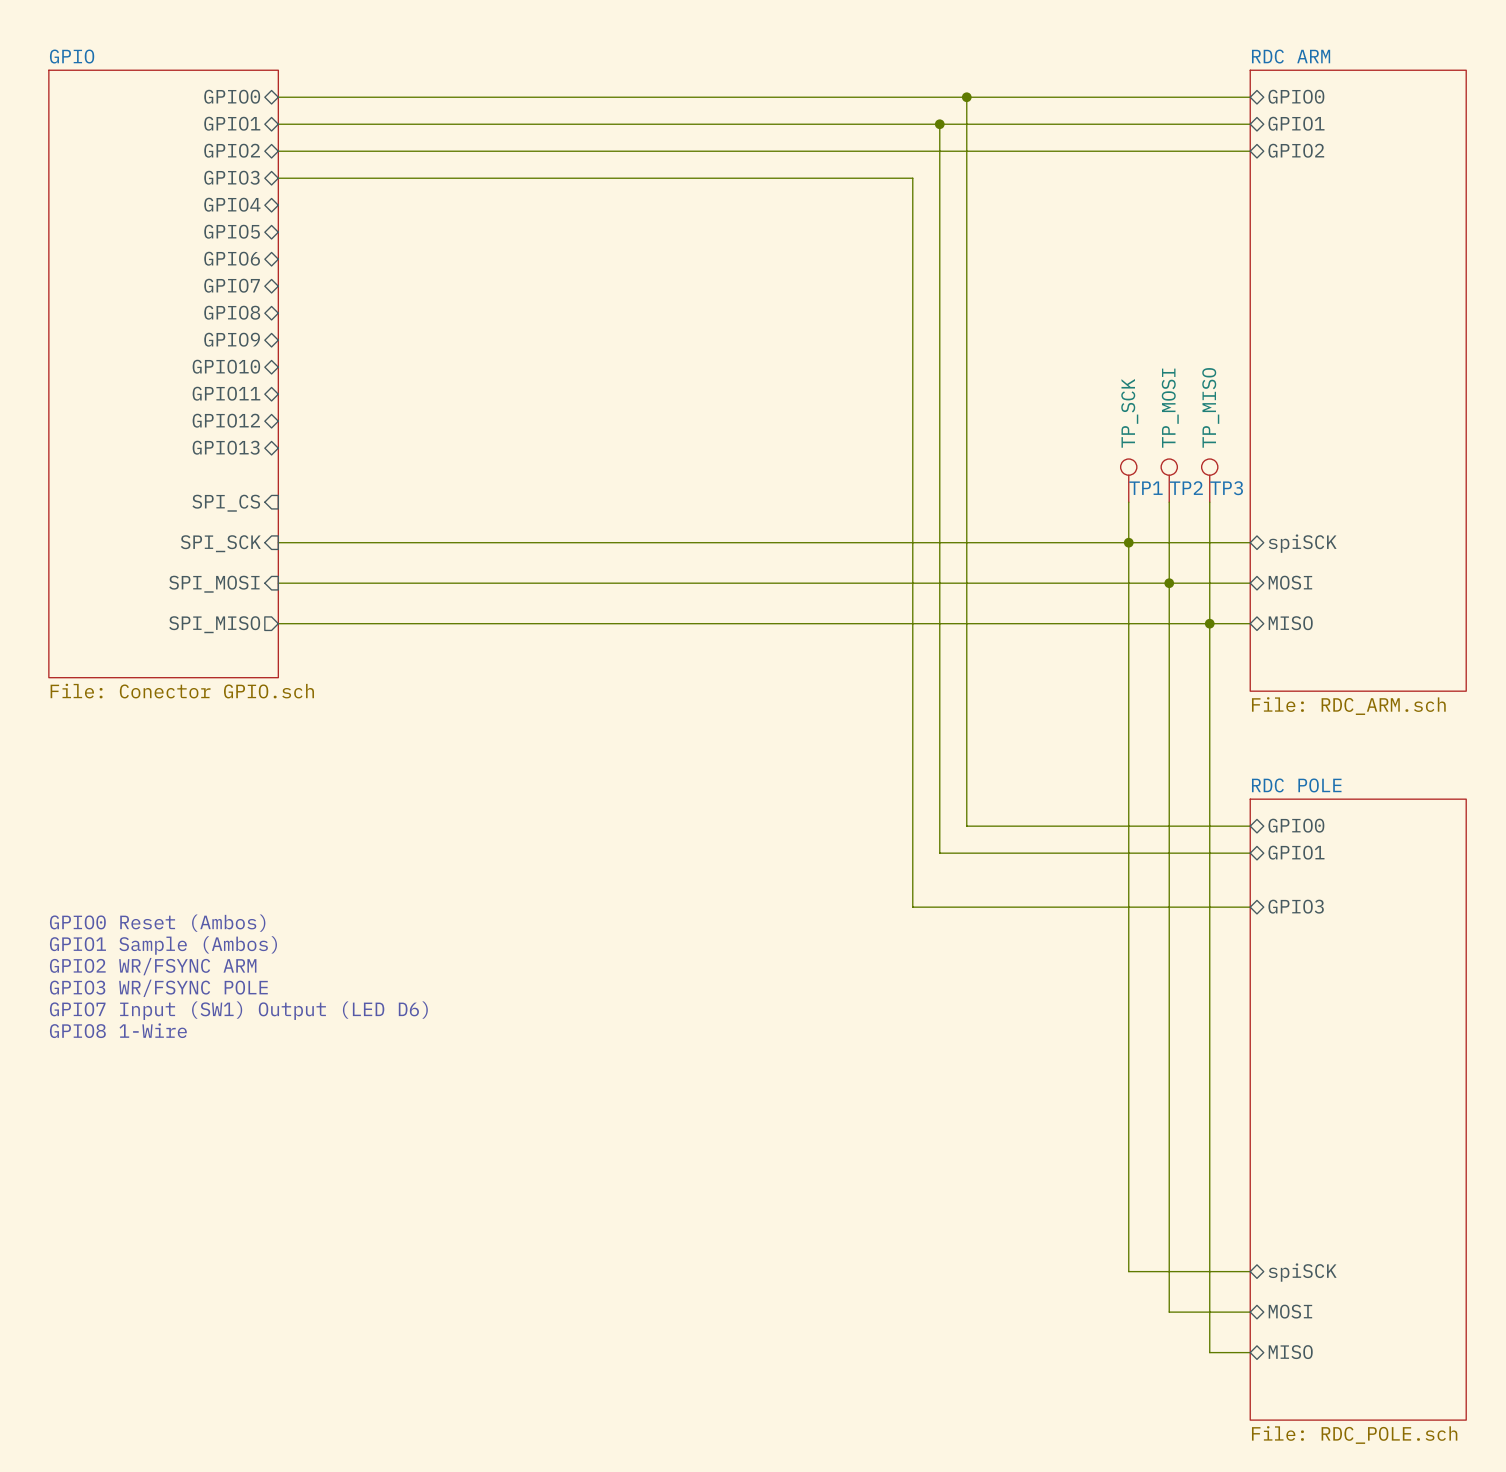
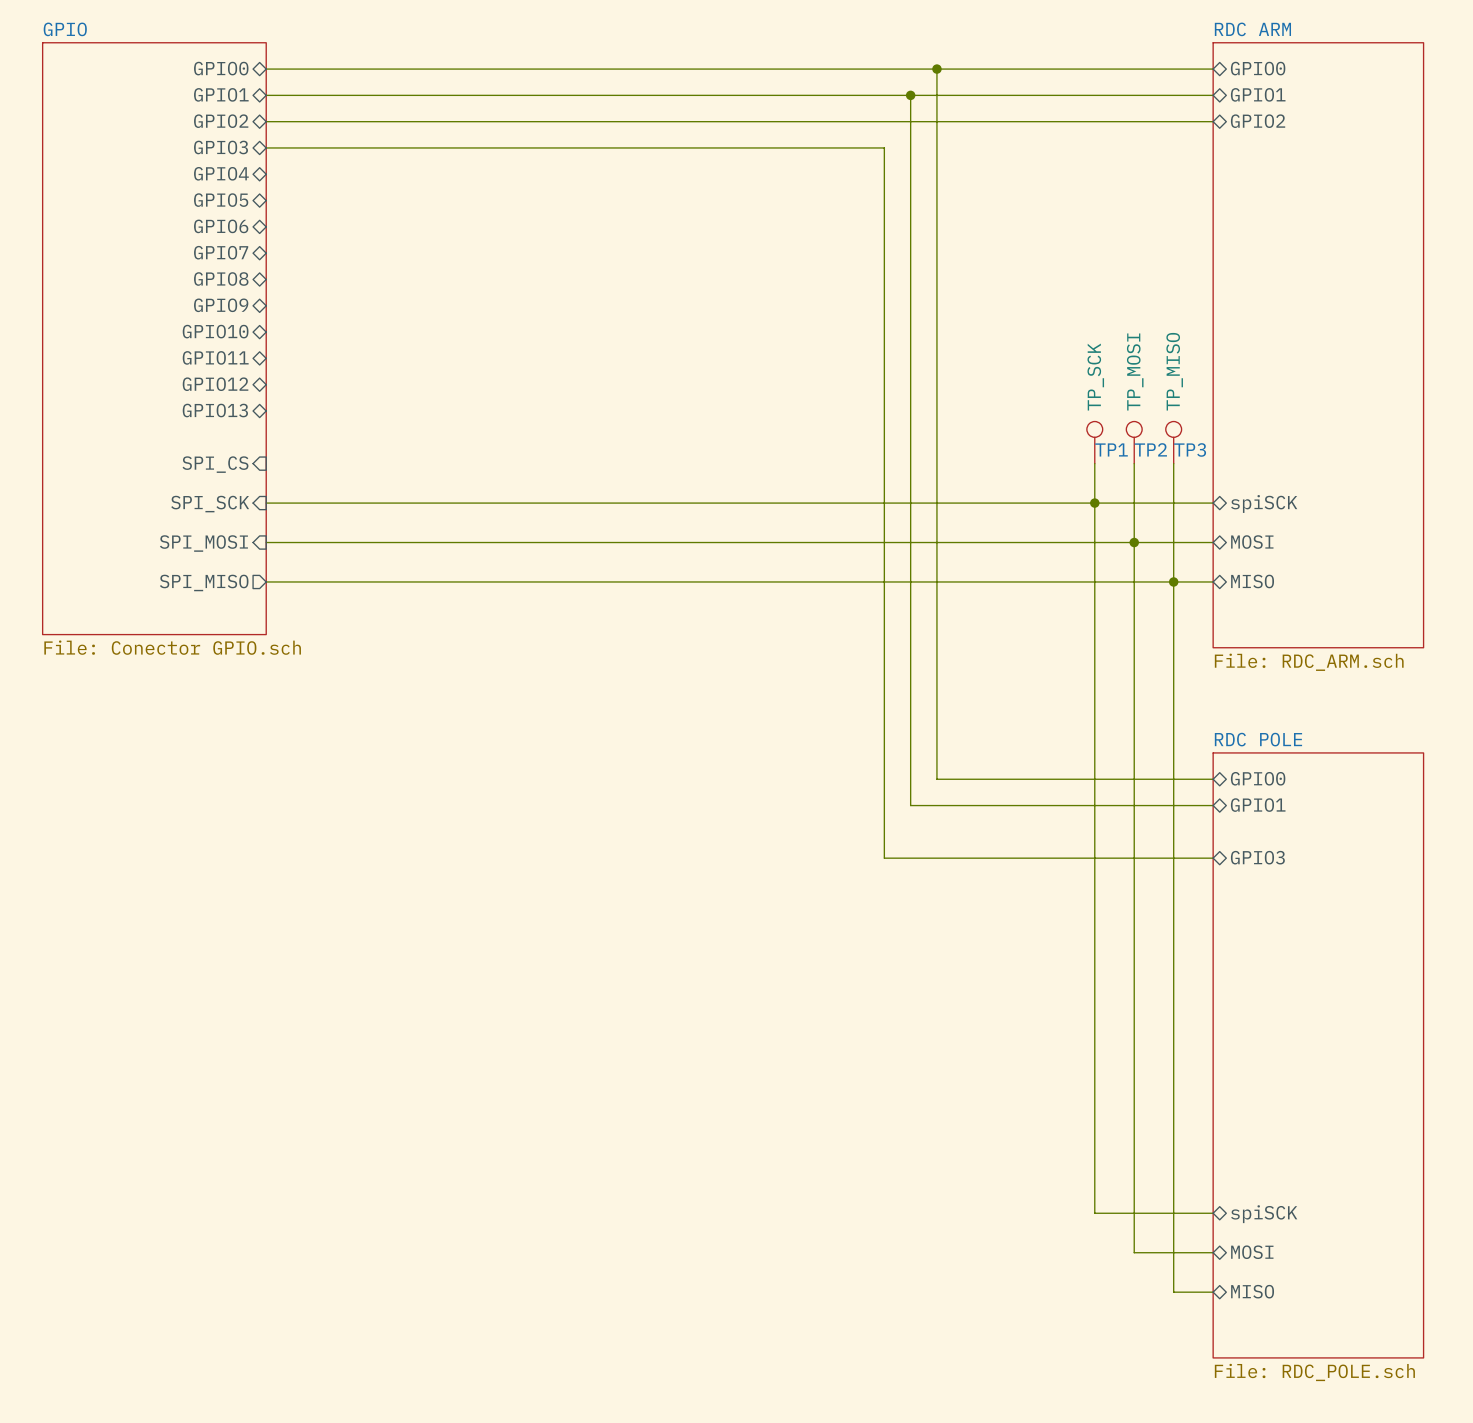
text: GPIO0 Reset (Ambos) (157, 923) -> none
text: GPIO1 Sample (Ambos) (163, 945) -> none
text: GPIO2 WR/FSYNC ARM (153, 966) -> none
text: GPIO3 WR/FSYNC POLE (158, 988) -> none
text: GPIO7 Input (SW1) Output (LED D6) (238, 1010) -> none
text: GPIO8 1-Wire (118, 1030) -> none

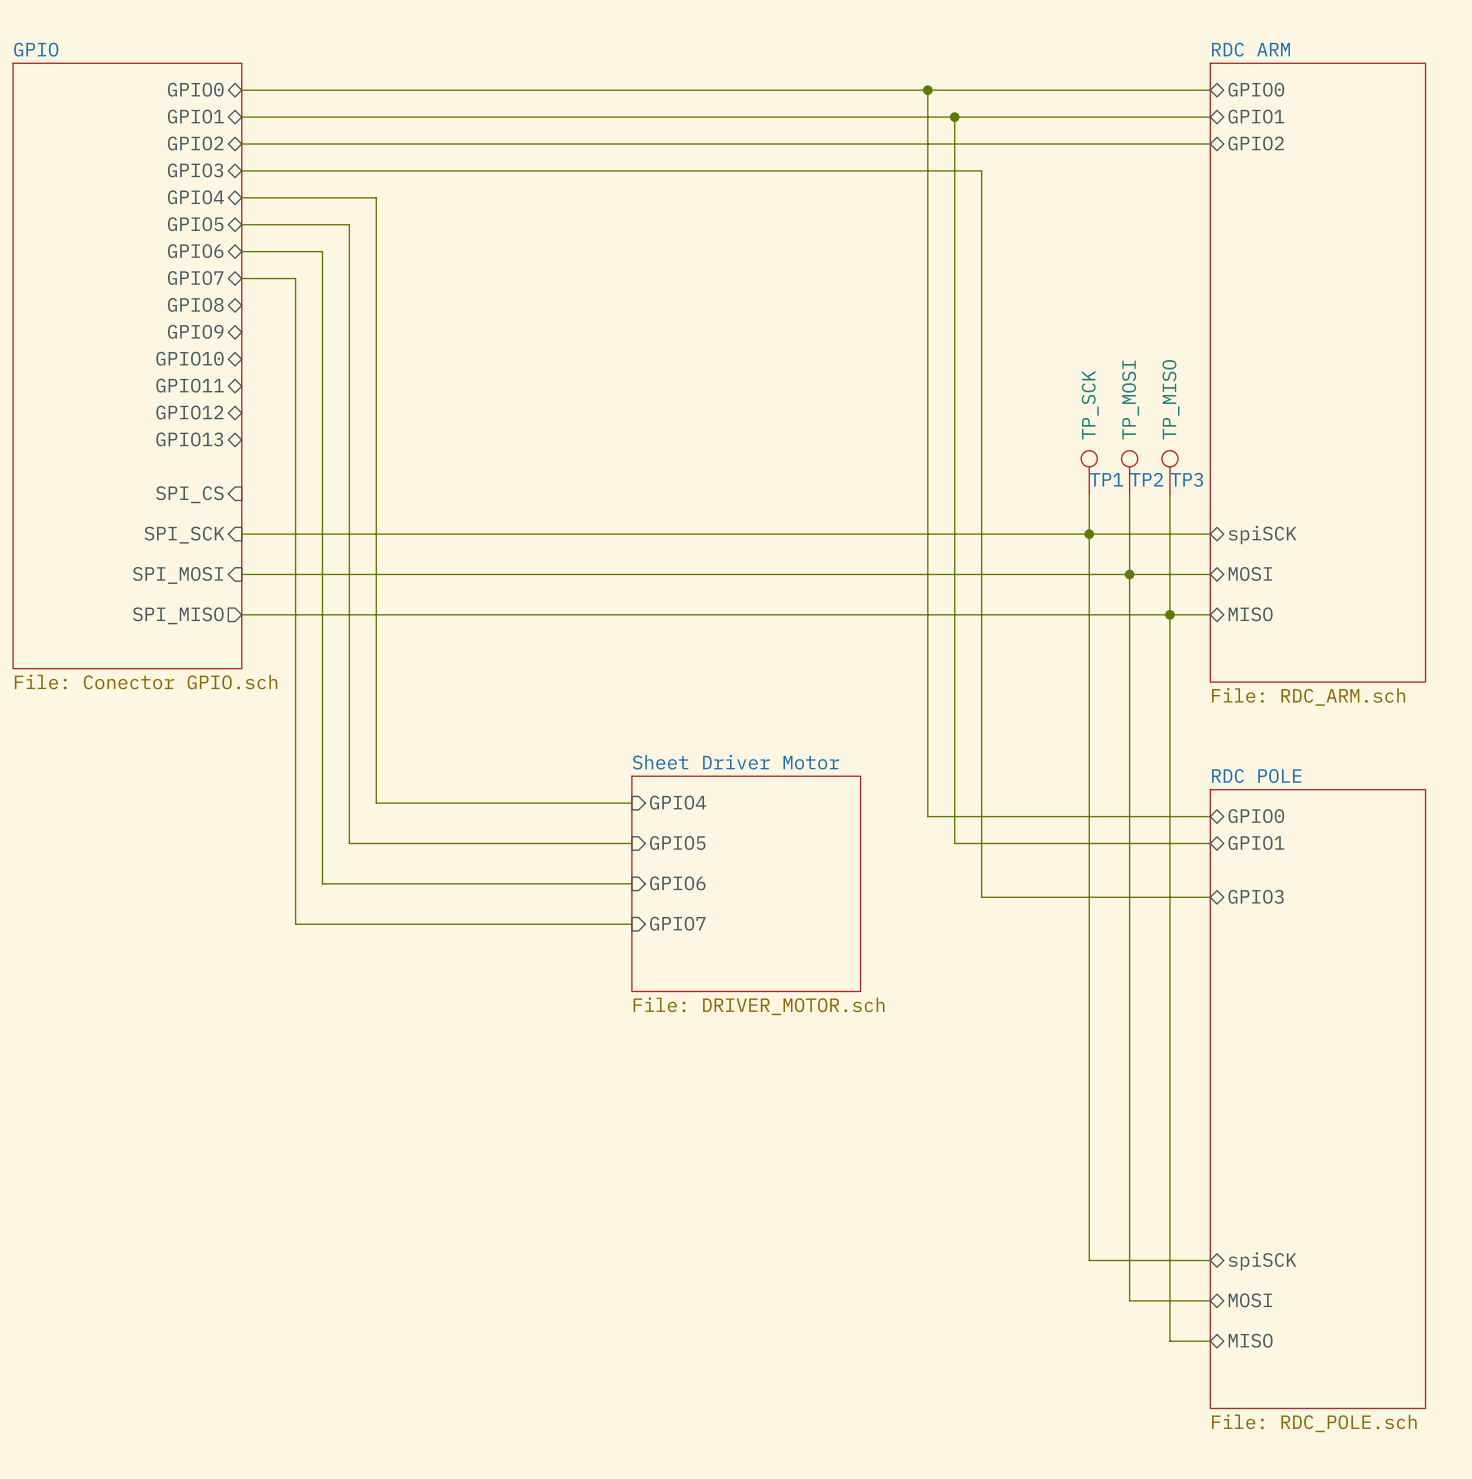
wire: (910, 95) (910, 805) (963, 805) -> (954, 117) (954, 843)
junction position: (910, 95) -> (954, 117)
wire: (884, 147) (884, 858) (989, 858) -> (874, 170) (981, 170) (981, 897)
wire: none -> (241, 197) (376, 197) (376, 803) (631, 803)
wire: none -> (241, 224) (349, 224) (349, 843) (631, 843)
wire: none -> (241, 251) (322, 251) (322, 883) (631, 883)
wire: none -> (241, 278) (295, 278) (295, 924) (631, 924)
sheet pin: none -> GPIO4 (678, 802)
sheet pin: none -> GPIO5 (677, 843)
sheet pin: none -> GPIO6 (677, 883)
sheet Sheet Driver Motor: none -> File: DRIVER_MOTOR.sch (746, 883)
sheet pin: none -> GPIO7 (677, 923)

